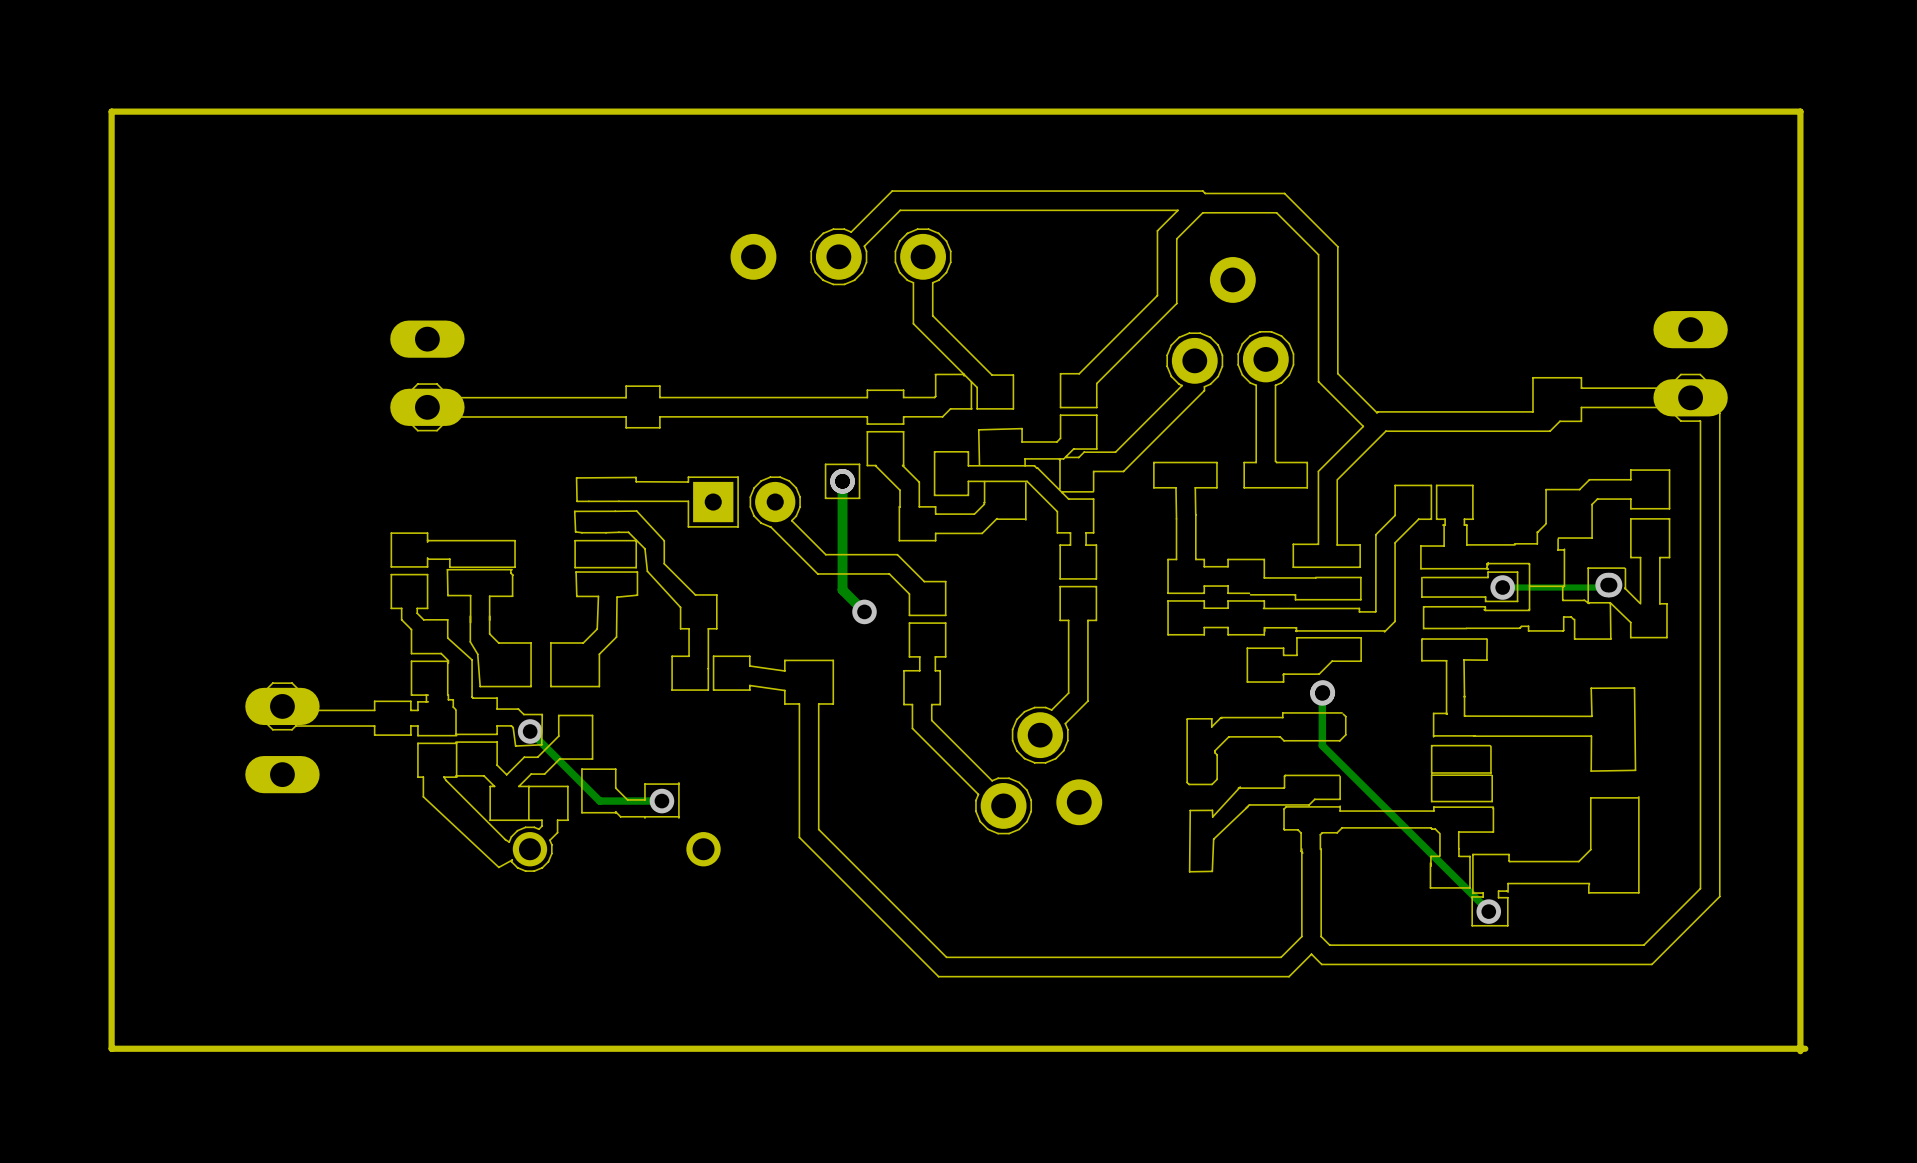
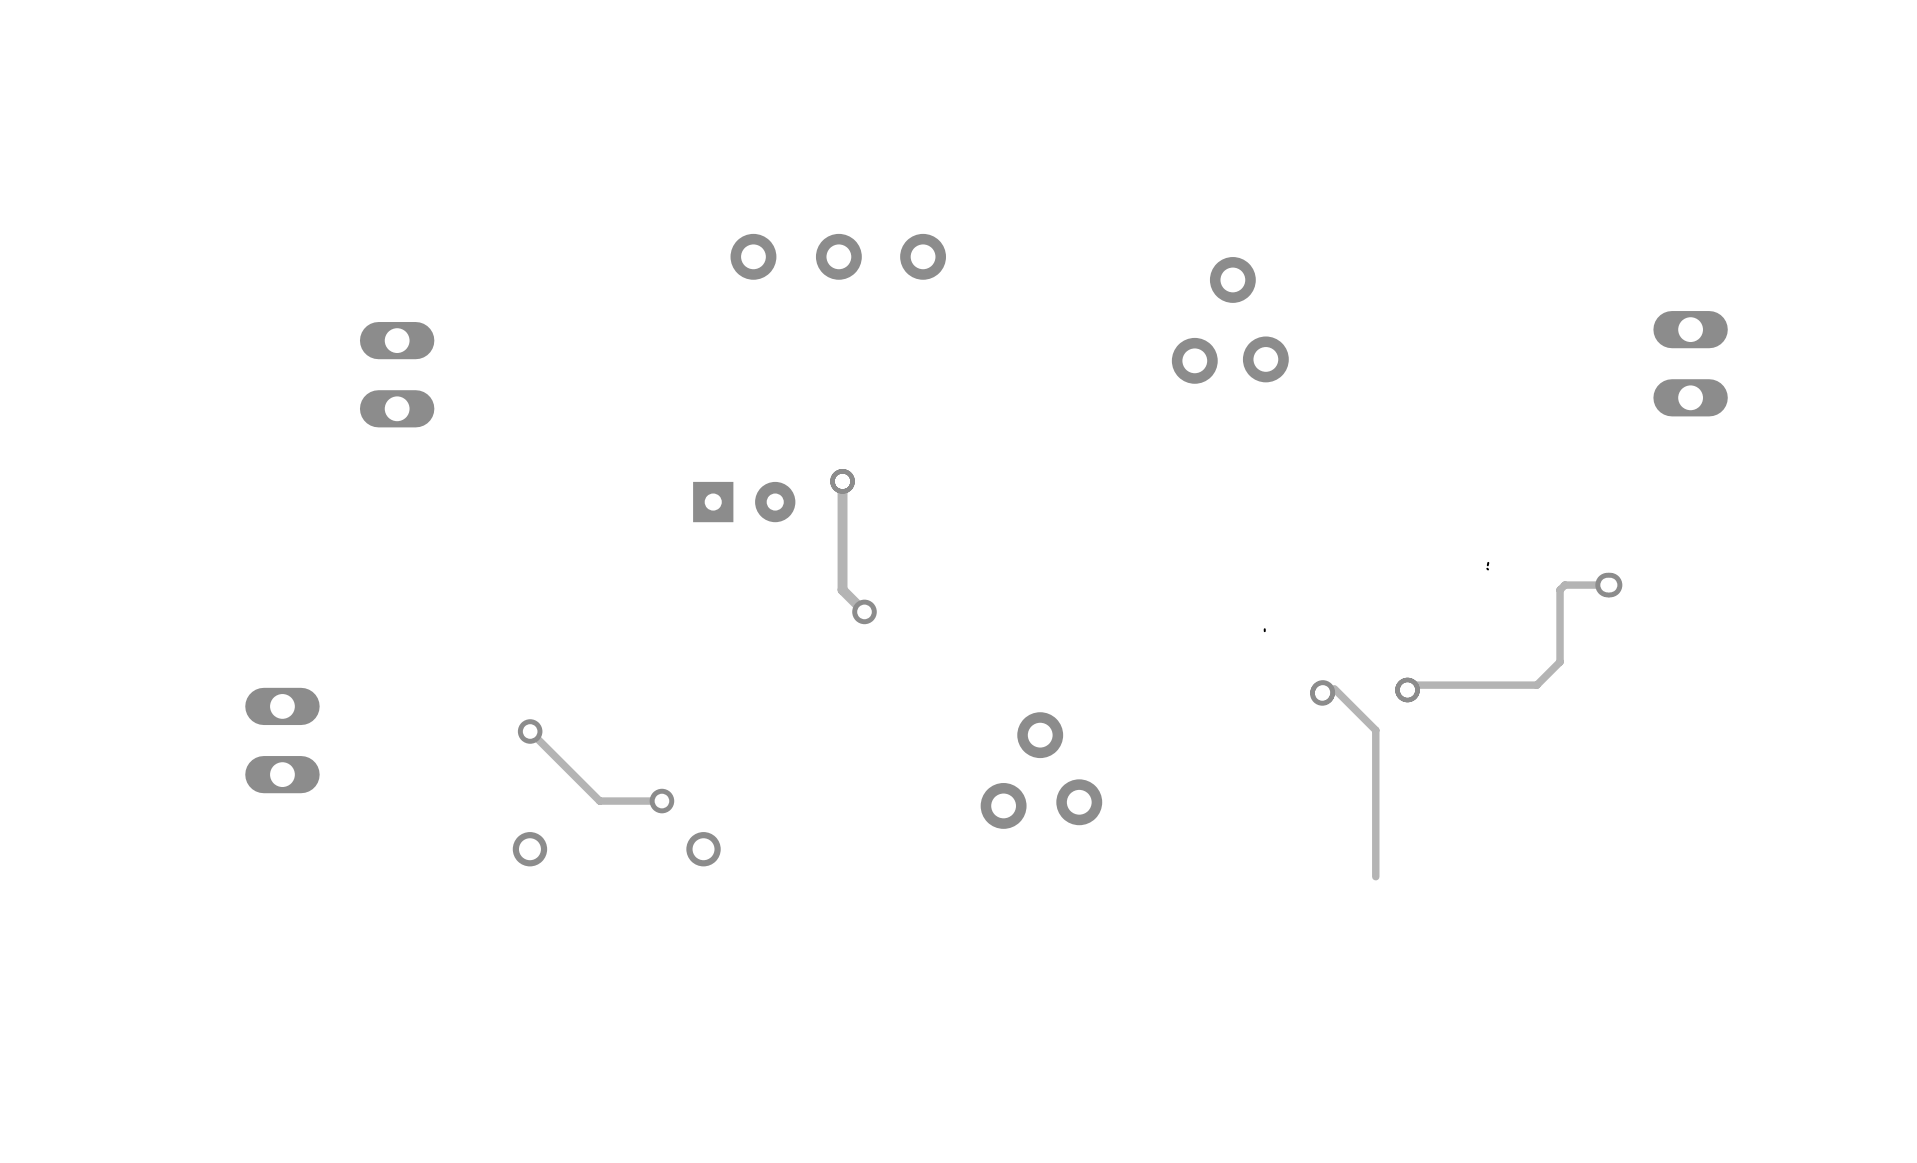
board edge: (928, 229) (917, 229) (907, 233) (899, 241) (895, 251) (895, 262) (899, 272) (907, 280) (913, 282) (913, 323) (977, 387) (977, 408) (1013, 408) (1013, 375) (992, 375) (932, 315) (932, 282) (938, 280) (946, 272) (950, 262) (950, 251) (946, 241) (938, 233) (928, 229) -> none
board edge: (1271, 331) (1260, 331) (1250, 336) (1242, 343) (1238, 353) (1238, 364) (1242, 375) (1250, 382) (1256, 385) (1256, 462) (1244, 462) (1244, 487) (1307, 487) (1307, 462) (1275, 461) (1275, 385) (1281, 382) (1289, 375) (1293, 364) (1293, 353) (1289, 343) (1281, 336) (1271, 331) -> none
part position: (427, 373) -> (397, 374)
board edge: (935, 374) (964, 375) -> none
board edge: (935, 375) (934, 397) (903, 397) (903, 390) (867, 390) (867, 397) (659, 397) (659, 386) (626, 386) (626, 397) (450, 397) (437, 384) (417, 384) (404, 397) (404, 416) (417, 430) (437, 430) (450, 416) (626, 416) (626, 427) (659, 427) (659, 416) (867, 416) (867, 424) (903, 424) (903, 416) (942, 416) (950, 408) (971, 408) -> none
board edge: (971, 382) (971, 408) -> none
board edge: (1700, 421) (1680, 421) (1667, 407) (1581, 407) (1581, 421) (1559, 421) (1550, 431) (1385, 431) (1337, 479) -> none
board edge: (1700, 421) (1700, 888) (1643, 945) (1329, 945) (1321, 936) (1321, 848) -> none
board edge: (968, 451) (934, 451) (934, 495) (968, 495) (968, 481) (1027, 481) (1057, 511) (1057, 532) (1070, 532) (1070, 545) (1060, 545) (1060, 578) (1096, 578) (1096, 545) (1086, 545) (1086, 532) (1093, 532) (1093, 499) (1068, 499) (1034, 465) (968, 465) (968, 451) -> none
board edge: (1066, 456) (1079, 457) -> none
board edge: (1078, 457) (1084, 452) (1115, 452) (1182, 385) (1171, 376) (1167, 366) (1167, 355) (1171, 345) (1179, 337) (1189, 333) (1200, 333) (1210, 337) (1218, 345) (1222, 355) (1222, 366) (1218, 376) (1210, 384) (1204, 386) (1204, 390) (1123, 471) (1093, 471) (1093, 491) -> none
board edge: (1063, 458) (1073, 449) (1096, 449) (1096, 415) (1060, 415) (1060, 438) (1056, 441) (1022, 441) (1022, 428) (978, 429) (979, 465) -> none
board edge: (1063, 458) (1025, 458) (1025, 465) -> none
board edge: (1059, 459) (1059, 488) -> none
board edge: (859, 464) (825, 464) (825, 498) (859, 498) (859, 464) -> none
board edge: (1318, 471) (1363, 426) (1318, 381) (1318, 254) (1276, 212) (1202, 212) (1176, 238) (1176, 303) (1096, 383) (1096, 407) (1060, 407) (1060, 373) (1079, 373) (1157, 295) (1157, 230) (1177, 210) (900, 210) (864, 246) (866, 262) (862, 272) (854, 280) (844, 284) (833, 284) (823, 280) (815, 272) (811, 262) (811, 251) (815, 241) (823, 233) (833, 229) (844, 229) (851, 232) (892, 191) (1202, 191) (1205, 193) (1284, 193) (1337, 246) (1337, 373) (1377, 412) (1532, 411) (1532, 377) (1581, 377) (1581, 388) (1667, 388) (1680, 374) (1700, 374) (1713, 388) (1713, 407) (1719, 413) (1719, 896) (1651, 964) (1321, 964) (1311, 954) (1289, 976) (938, 976) (799, 837) (799, 703) (784, 703) (784, 690) (749, 685) (749, 690) (713, 690) (713, 656) (749, 656) (749, 666) (784, 671) (784, 660) (833, 660) (833, 703) (818, 703) (818, 829) (946, 957) (1281, 957) (1301, 936) (1301, 848) -> none
board edge: (1318, 472) (1318, 544) (1293, 544) (1293, 567) (1360, 567) (1360, 545) (1337, 545) (1337, 479) -> none
board edge: (738, 477) (688, 477) (688, 482) (636, 481) (635, 477) (576, 477) (577, 501) (688, 501) (688, 526) (738, 526) (738, 477) -> none
board edge: (984, 481) (984, 502) -> none
board edge: (1025, 483) (1025, 519) -> none
board edge: (1093, 491) (1061, 492) -> none
board edge: (984, 502) (974, 514) -> none
board edge: (636, 511) (574, 511) (575, 531) (628, 532) (644, 548) (647, 571) (680, 607) (680, 628) (689, 628) (689, 656) (672, 656) (672, 690) (708, 690) (708, 628) (716, 628) (716, 594) (695, 594) (664, 563) (664, 540) (636, 511) -> none
board edge: (974, 514) (935, 514) (935, 506) (919, 506) (919, 482) (902, 465) (903, 431) (867, 431) (867, 465) (875, 465) (899, 490) (899, 540) (935, 540) (935, 533) (982, 533) (997, 518) -> none
board edge: (1195, 514) (1195, 559) (1204, 559) (1204, 566) (1228, 566) (1228, 559) (1264, 559) (1264, 577) (1315, 577) -> none
board edge: (1195, 514) (1195, 487) (1216, 487) (1216, 462) (1153, 462) (1153, 487) (1175, 487) (1176, 559) (1168, 559) (1168, 593) (1204, 593) (1204, 586) (1228, 586) (1228, 593) (1249, 593) -> none
board edge: (1025, 519) (997, 519) -> none
board edge: (1546, 523) (1546, 489) (1579, 489) (1589, 479) (1630, 479) (1630, 470) (1669, 470) (1669, 508) (1630, 508) (1630, 499) (1597, 499) (1592, 504) (1592, 538) (1558, 538) -> none
board edge: (1546, 523) (1537, 532) -> none
board edge: (1442, 525) (1445, 525) (1445, 519) (1436, 519) (1436, 485) (1472, 485) (1472, 519) (1464, 519) (1464, 525) (1466, 525) (1466, 544) (1514, 544) -> none
board edge: (1444, 525) (1444, 546) (1420, 546) (1420, 568) (1487, 568) -> none
board edge: (770, 526) (817, 573) (889, 573) (909, 594) (909, 615) (945, 615) (945, 581) (924, 581) (897, 554) (825, 554) (791, 520) (796, 516) (800, 506) (800, 497) (796, 487) (789, 480) (780, 477) (770, 477) (761, 480) (754, 487) (750, 497) (750, 506) (754, 516) (761, 523) (770, 526) -> none
board edge: (1537, 532) (1537, 543) (1514, 543) -> none
board edge: (1558, 539) (1558, 549) -> none
board edge: (427, 540) (515, 540) (515, 567) (449, 567) (449, 559) (427, 559) -> none
board edge: (636, 540) (575, 540) (575, 567) (636, 567) (636, 540) -> none
board edge: (427, 542) (427, 533) (391, 533) (391, 566) (427, 566) (427, 557) -> none
board edge: (1395, 542) (1418, 519) (1431, 519) (1431, 485) (1395, 485) (1395, 515) (1375, 534) (1375, 612) -> none
board edge: (1395, 543) (1395, 621) (1384, 631) -> none
board edge: (1557, 549) (1564, 549) (1564, 586) (1529, 586) (1529, 563) (1487, 563) (1487, 567) -> none
board edge: (1624, 568) (1588, 568) (1588, 602) (1610, 602) (1630, 622) (1630, 637) (1666, 637) (1666, 603) (1659, 603) (1659, 557) (1669, 557) (1669, 518) (1630, 518) (1630, 557) (1640, 557) (1640, 603) -> none
board edge: (1625, 568) (1624, 588) -> none
board edge: (512, 569) (447, 569) (447, 595) (470, 595) (470, 622) -> none
board edge: (510, 570) (513, 575) -> none
board edge: (637, 572) (637, 595) (617, 597) (616, 637) (599, 654) (599, 686) (550, 686) (550, 642) (583, 642) (597, 629) (598, 596) (576, 596) (576, 572) (637, 572) -> none
board edge: (512, 574) (512, 596) (489, 596) (489, 620) -> none
board edge: (1315, 577) (1360, 577) (1360, 599) (1295, 599) (1295, 594) (1250, 594) -> none
board edge: (1423, 577) (1488, 577) (1488, 572) (1517, 572) (1517, 601) (1485, 601) (1485, 597) (1421, 597) (1421, 577) -> none
track: none -> (1605, 585) (1564, 585) (1560, 589) (1560, 661) (1536, 685) (1412, 685) (1407, 690)
track: (1610, 585) (1607, 587) (1502, 587) -> none
board edge: (1096, 586) (1060, 586) (1060, 620) (1068, 620) (1068, 693) (1051, 710) (1045, 707) (1034, 707) (1024, 711) (1016, 719) (1012, 729) (1012, 740) (1016, 750) (1024, 758) (1034, 762) (1045, 762) (1055, 758) (1063, 750) (1067, 740) (1067, 729) (1065, 723) (1087, 701) (1087, 620) (1096, 620) (1096, 586) -> none
board edge: (1563, 586) (1562, 600) -> none
via: (1502, 587) -> none
board edge: (1529, 587) (1528, 609) -> none
board edge: (1625, 588) (1639, 602) -> none
board edge: (1583, 600) (1562, 600) -> none
board edge: (1584, 600) (1589, 603) -> none
board edge: (1610, 603) (1610, 639) (1574, 639) (1574, 619) -> none
board edge: (1485, 606) (1423, 606) (1423, 628) (1466, 628) -> none
board edge: (1485, 607) (1485, 610) (1529, 610) -> none
board edge: (1263, 608) (1359, 608) (1359, 611) (1374, 611) -> none
board edge: (1264, 608) (1264, 600) (1228, 600) (1228, 608) (1204, 608) (1204, 600) (1168, 600) (1168, 634) (1204, 634) (1204, 627) (1228, 627) (1228, 634) (1264, 634) (1264, 627) -> none
board edge: (489, 616) (489, 633) (498, 642) (531, 642) (531, 686) (480, 686) (477, 654) (470, 641) (470, 616) -> none
board edge: (1573, 619) (1571, 617) (1563, 617) (1563, 630) (1528, 630) (1528, 626) (1521, 626) -> none
board edge: (945, 623) (945, 656) (935, 656) (935, 670) (940, 670) (940, 704) (931, 704) (931, 720) (992, 780) (998, 778) (1009, 778) (1019, 782) (1027, 790) (1031, 800) (1031, 811) (1027, 821) (1019, 829) (1009, 833) (998, 833) (987, 829) (980, 821) (975, 811) (975, 800) (978, 794) (912, 728) (912, 704) (903, 704) (903, 670) (919, 670) (919, 656) (909, 656) (909, 623) (945, 623) -> none
board edge: (1521, 626) (1519, 628) (1466, 628) -> none
board edge: (1264, 627) (1296, 627) (1296, 631) -> none
board edge: (1384, 630) (1296, 630) -> none
board edge: (1486, 639) (1421, 639) (1421, 660) (1446, 660) -> none
board edge: (1487, 639) (1486, 660) (1464, 659) (1464, 716) (1591, 716) (1591, 688) (1634, 688) (1635, 770) (1591, 771) (1591, 736) (1474, 736) -> none
board edge: (441, 653) (448, 663) -> none
board edge: (441, 653) (411, 653) (411, 629) (401, 619) (401, 608) (391, 608) (391, 574) (427, 574) (427, 608) (417, 608) (417, 613) (423, 619) (447, 619) (447, 638) (472, 659) (472, 697) (497, 698) (497, 709) (518, 709) (523, 714) (542, 714) (541, 744) (515, 746) (511, 725) (497, 725) (497, 734) (456, 734) (456, 710) -> none
board edge: (1283, 655) (1283, 648) (1247, 648) (1247, 682) (1283, 682) (1283, 674) -> none
board edge: (1284, 655) (1296, 655) (1296, 637) (1361, 637) (1361, 661) (1332, 661) (1319, 674) (1283, 674) -> none
board edge: (1446, 660) (1446, 714) -> none
track: none -> (1334, 688) (1375, 730) (1375, 876)
via: none -> (1407, 690)
track: (1322, 693) (1322, 745) (1490, 912) -> none
board edge: (426, 694) (426, 702) -> none
board edge: (448, 694) (448, 699) (453, 699) (453, 707) (455, 709) -> none
board edge: (447, 695) (447, 661) (411, 661) (411, 695) (428, 695) -> none
board edge: (428, 701) (417, 701) (417, 710) (410, 710) (410, 701) (374, 701) (374, 710) (305, 710) (305, 696) (292, 683) (272, 683) (259, 696) (259, 716) (272, 729) (292, 729) (295, 726) (374, 726) (374, 735) (410, 735) (410, 726) (417, 726) (417, 735) (456, 735) -> none
board edge: (1342, 712) (1282, 712) (1282, 717) (1221, 717) -> none
board edge: (1343, 714) (1345, 716) (1345, 734) (1339, 740) (1284, 740) (1280, 736) (1228, 736) (1214, 750) (1217, 754) (1217, 779) (1212, 784) (1189, 784) (1187, 782) (1187, 719) (1211, 718) (1211, 726) (1221, 718) -> none
board edge: (1446, 714) (1433, 713) (1433, 736) -> none
board edge: (1474, 735) (1433, 735) -> none
board edge: (456, 742) (497, 742) (497, 765) (506, 774) (524, 757) (537, 757) (558, 736) (558, 715) (592, 715) (592, 759) (559, 759) (544, 774) (531, 774) (518, 786) (528, 786) (528, 820) (490, 820) (490, 786) (494, 786) (484, 775) (456, 775) -> none
board edge: (1489, 745) (1431, 745) (1431, 772) (1490, 772) (1490, 746) -> none
board edge: (1339, 775) (1285, 775) (1283, 788) (1238, 788) -> none
board edge: (1491, 775) (1431, 775) (1431, 801) (1492, 801) (1492, 775) -> none
board edge: (1340, 776) (1340, 799) (1314, 799) (1309, 804) (1249, 804) (1245, 808) -> none
board edge: (678, 782) (678, 818) -> none
board edge: (678, 784) (644, 784) (644, 799) (627, 799) (615, 788) (615, 769) (581, 769) (581, 812) (615, 811) (620, 816) (644, 818) -> none
board edge: (529, 786) (567, 786) (567, 820) (557, 820) (557, 832) (549, 840) (551, 853) (548, 861) (542, 867) (534, 871) (525, 871) (517, 867) (511, 861) (512, 860) (498, 867) (423, 796) (423, 777) (417, 777) (417, 743) (456, 743) (456, 777) (443, 777) (505, 839) (509, 842) (517, 830) (525, 827) (538, 829) (541, 826) (541, 820) (529, 820) -> none
board edge: (1240, 787) (1212, 816) (1212, 810) (1190, 810) (1189, 871) (1212, 871) (1213, 839) (1248, 806) -> none
board edge: (1638, 796) (1638, 892) (1588, 892) (1588, 885) -> none
board edge: (1637, 797) (1590, 797) (1590, 849) (1578, 861) (1509, 861) (1509, 854) (1472, 854) (1472, 893) -> none
board edge: (1338, 806) (1286, 806) (1284, 809) (1284, 829) (1297, 829) (1301, 833) (1301, 851) (1302, 853) -> none
board edge: (1340, 806) (1340, 811) (1433, 811) (1433, 807) (1493, 807) -> none
board edge: (1493, 808) (1493, 832) (1458, 832) (1458, 848) -> none
board edge: (678, 816) (644, 816) -> none
board edge: (1439, 833) (1430, 827) (1342, 827) (1337, 832) (1322, 832) (1320, 834) (1320, 849) -> none
board edge: (1439, 833) (1439, 855) -> none
board edge: (1458, 848) (1458, 856) -> none
board edge: (1430, 856) (1430, 866) -> none
board edge: (1439, 856) (1431, 856) -> none
board edge: (1459, 856) (1469, 856) (1469, 887) (1430, 887) (1430, 863) -> none
board edge: (1589, 884) (1508, 883) (1508, 892) -> none
board edge: (1507, 891) (1498, 891) (1498, 897) (1507, 897) (1507, 925) (1472, 925) (1472, 896) (1483, 896) (1483, 893) (1472, 893) -> none
via: (1488, 911) -> none
board edge: (1805, 1048) (111, 1048) (111, 111) (1800, 111) (1800, 1051) -> none

